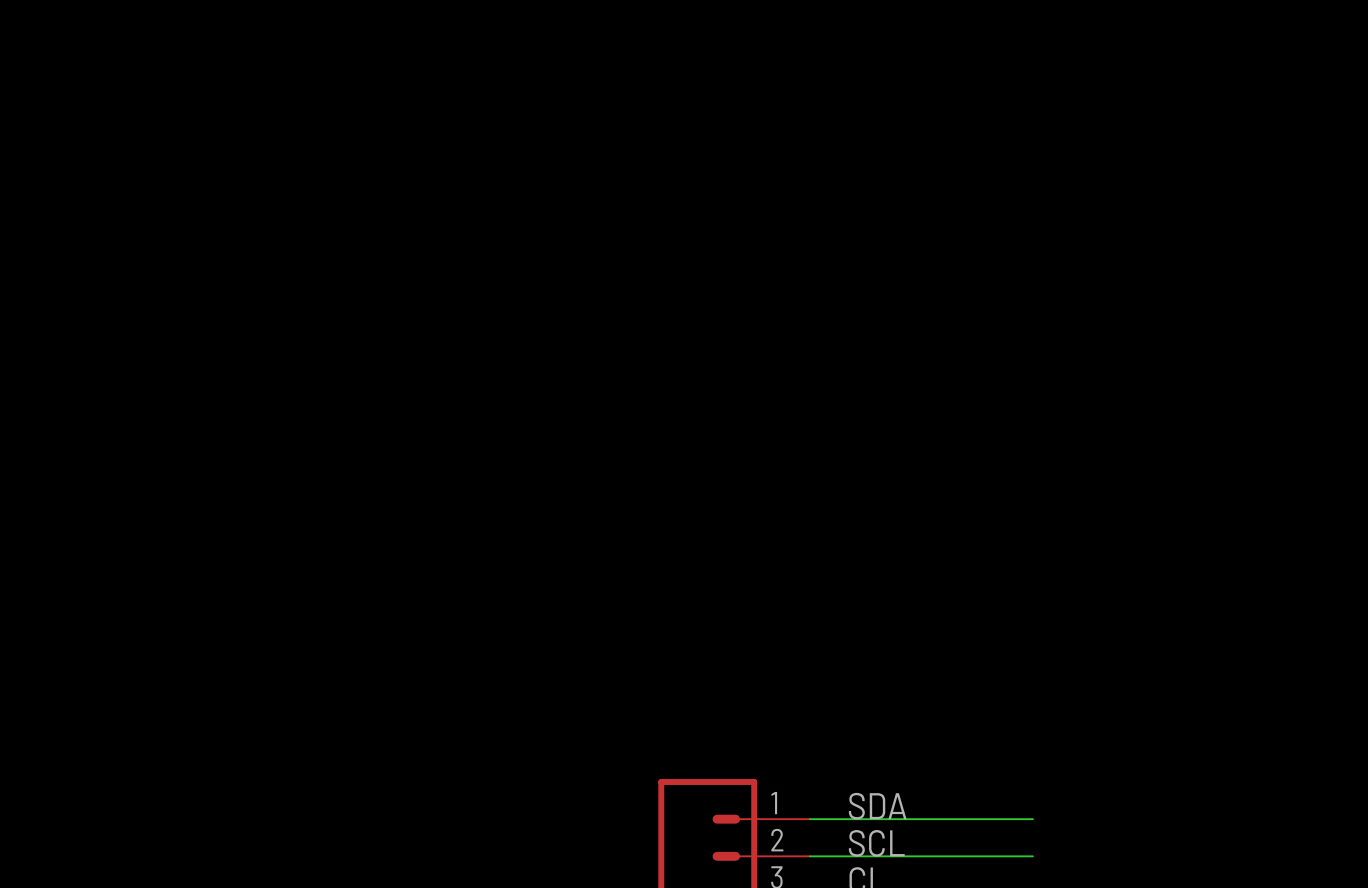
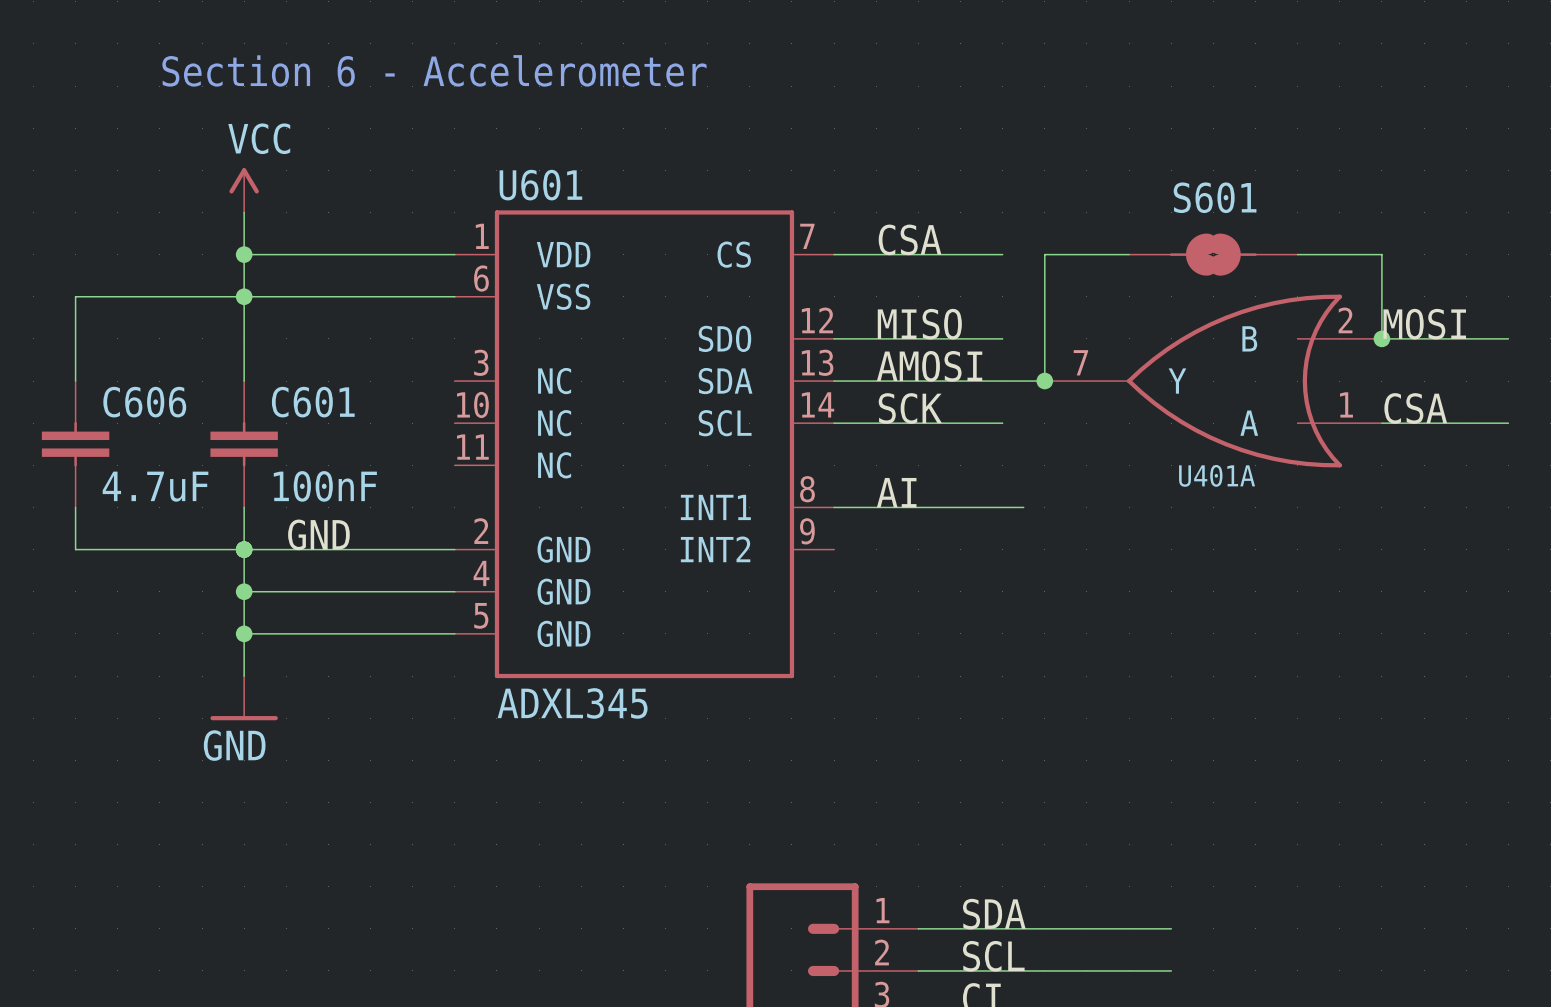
text: none -> Section 6 - Accelerometer (434, 70)
power symbol: none -> VCC (244, 190)
wire: none -> (244, 212) (244, 381)
label: none -> CSA (910, 239)
wire: none -> (244, 254) (454, 254)
junction: none -> (244, 254)
wire: none -> (834, 254) (1002, 254)
wire: none -> (1129, 254) (1044, 254) (1044, 381) (834, 381)
S601: none -> (1213, 254)
wire: none -> (1297, 254) (1381, 254) (1381, 338) (1508, 338)
junction: none -> (244, 296)
wire: none -> (454, 296) (75, 296) (75, 381)
label: none -> MISO (919, 324)
label: none -> MOSI (1424, 324)
wire: none -> (834, 338) (1002, 338)
junction: none -> (1381, 338)
label: none -> AMOSI (929, 366)
junction: none -> (1044, 381)
U401A: none -> (1213, 381)
label: none -> SCK (910, 408)
label: none -> CSA (1415, 408)
wire: none -> (834, 423) (1002, 423)
wire: none -> (1381, 423) (1508, 423)
C606: none -> 4.7uF (75, 444)
C601: none -> 100nF (244, 444)
U601: none -> ADXL345 (644, 444)
label: none -> AI (896, 492)
wire: none -> (75, 507) (75, 549) (454, 549)
wire: none -> (244, 507) (244, 676)
wire: none -> (834, 507) (1023, 507)
label: none -> GND (318, 534)
junction: none -> (244, 549)
wire: none -> (244, 591) (454, 591)
junction: none -> (244, 591)
wire: none -> (244, 633) (454, 633)
junction: none -> (244, 633)
power symbol: none -> GND (244, 698)

